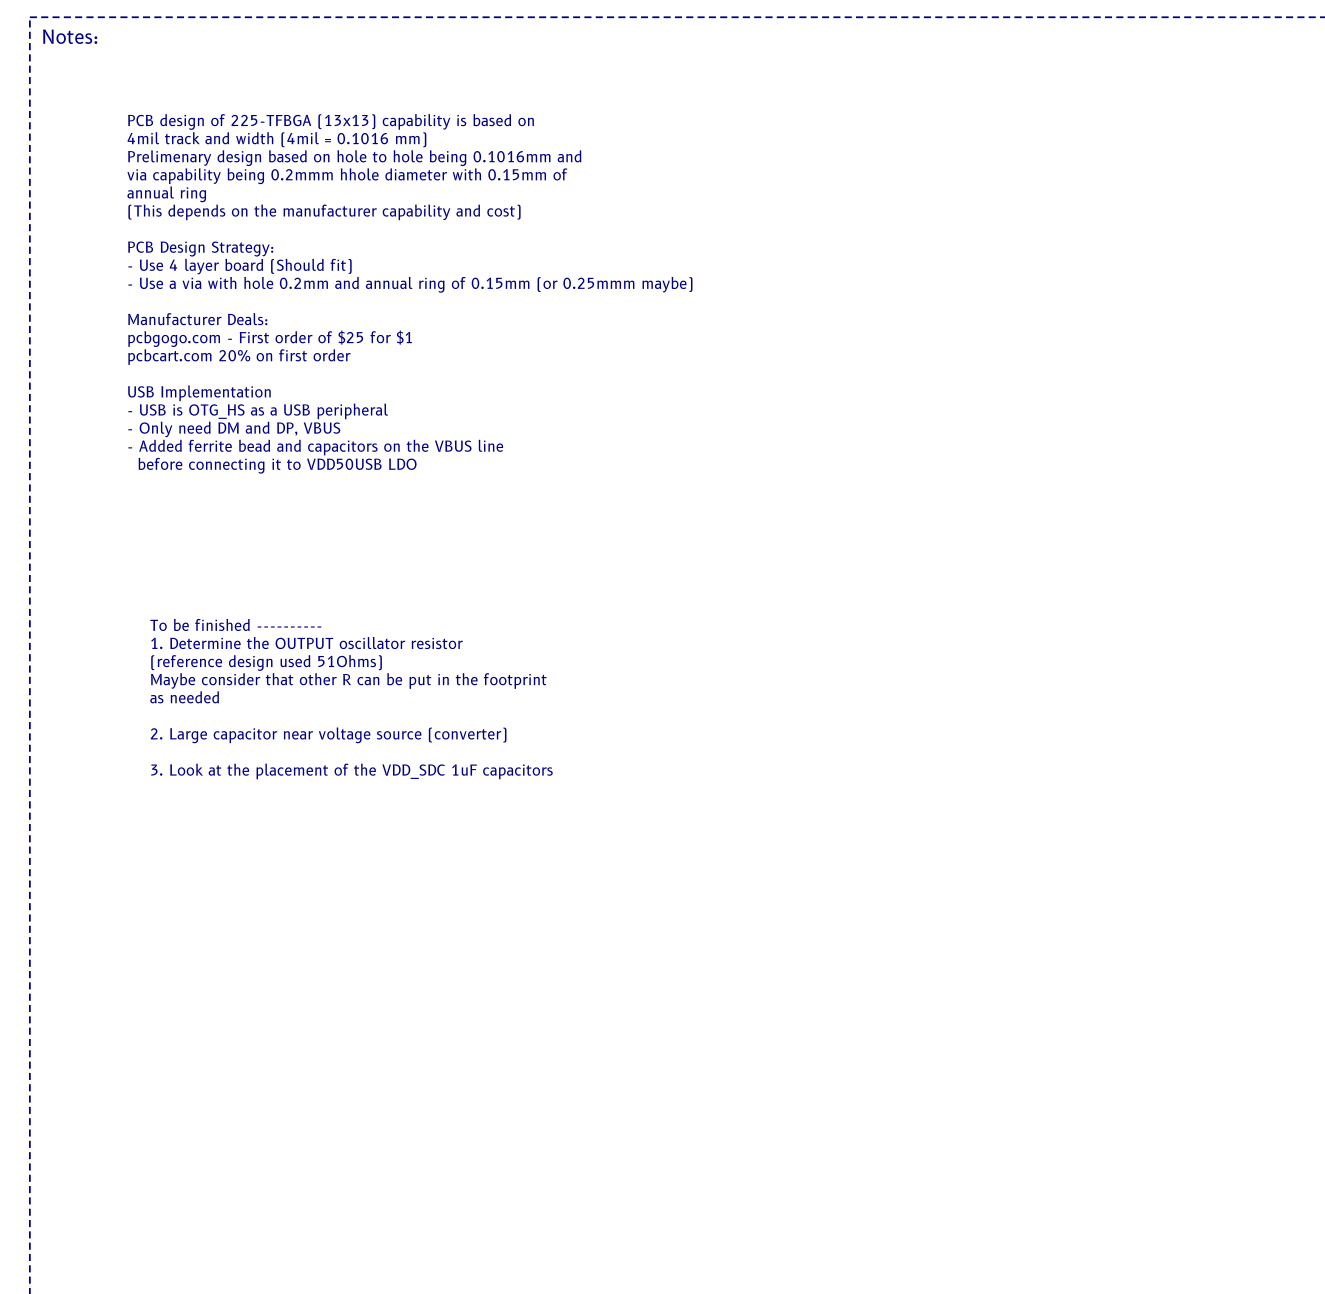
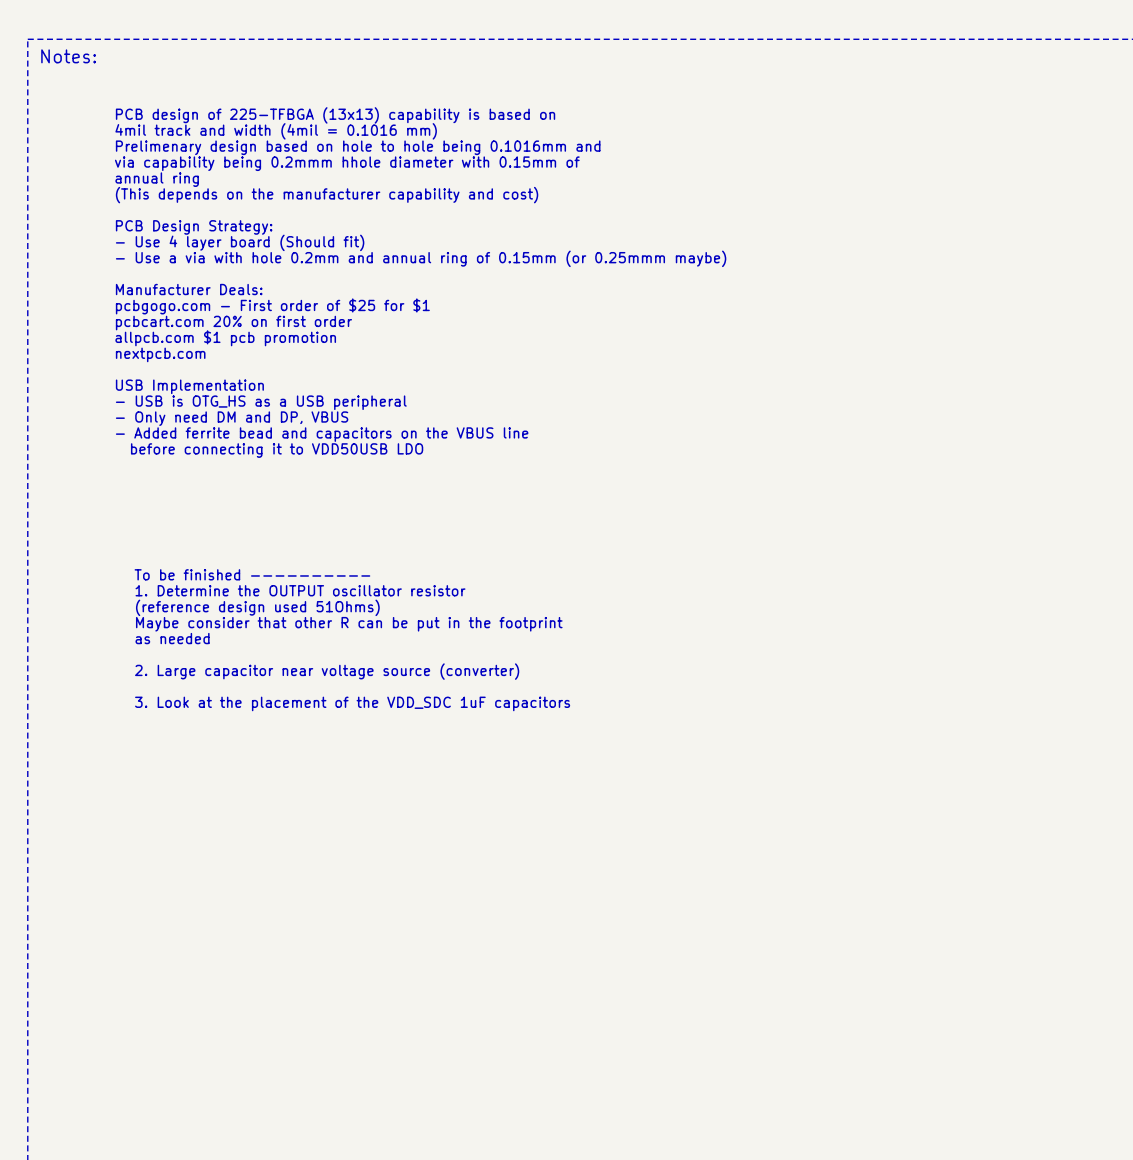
text: none -> PCB design of 225-TFBGA (13x13) capability is based on (335, 115)
text: PCB design of 225-TFBGA (13x13) capability is based on (330, 121) -> 4mil track and width (4mil = 0.1016 mm) (276, 131)
text: 4mil track and width (4mil = 0.1016 mm) (276, 139) -> Prelimenary design based on hole to hole being 0.1016mm and (358, 147)
text: Prelimenary design based on hole to hole being 0.1016mm and (354, 158) -> via capability being 0.2mmm hhole diameter with 0.15mm of (347, 163)
text: via capability being 0.2mmm hhole diameter with 0.15mm of (347, 176) -> annual ring (157, 179)
text: annual ring (166, 194) -> (This depends on the manufacturer capability and cost) (327, 195)
text: (This depends on the manufacturer capability and cost) (324, 212) -> none
text: none -> PCB Design Strategy: (194, 227)
text: PCB Design Strategy: (200, 249) -> - Use 4 layer board (Should fit) (240, 242)
text: - Use 4 layer board (Should fit) (240, 266) -> - Use a via with hole 0.2mm and annual ring of 0.15mm (or 0.25mmm maybe) (421, 258)
text: - Use a via with hole 0.2mm and annual ring of 0.15mm (or 0.25mmm maybe) (410, 284) -> none
text: none -> Manufacturer Deals: (189, 289)
text: Manufacturer Deals: (197, 319) -> pcbgogo.com - First order of $25 for $1 (272, 306)
text: pcbgogo.com - First order of $25 for $1 (270, 338) -> pcbcart.com 20% on first order (233, 323)
text: pcbcart.com 20% on first order (239, 357) -> allpcb.com $1 pcb promotion (225, 338)
text: none -> nextpcb.com (160, 354)
text: USB Implementation (199, 393) -> none
text: - USB is OTG_HS as a USB peripheral (258, 411) -> USB Implementation (189, 386)
text: - Only need DM and DP, VBUS (234, 429) -> - USB is OTG_HS as a USB peripheral (261, 402)
text: - Added ferrite bead and capacitors on the VBUS line (315, 447) -> - Only need DM and DP, VBUS (232, 418)
text: before connecting it to VDD50USB LDO (277, 465) -> - Added ferrite bead and capacitors on the VBUS line (322, 434)
text: none -> before connecting it to VDD50USB LDO (277, 450)

